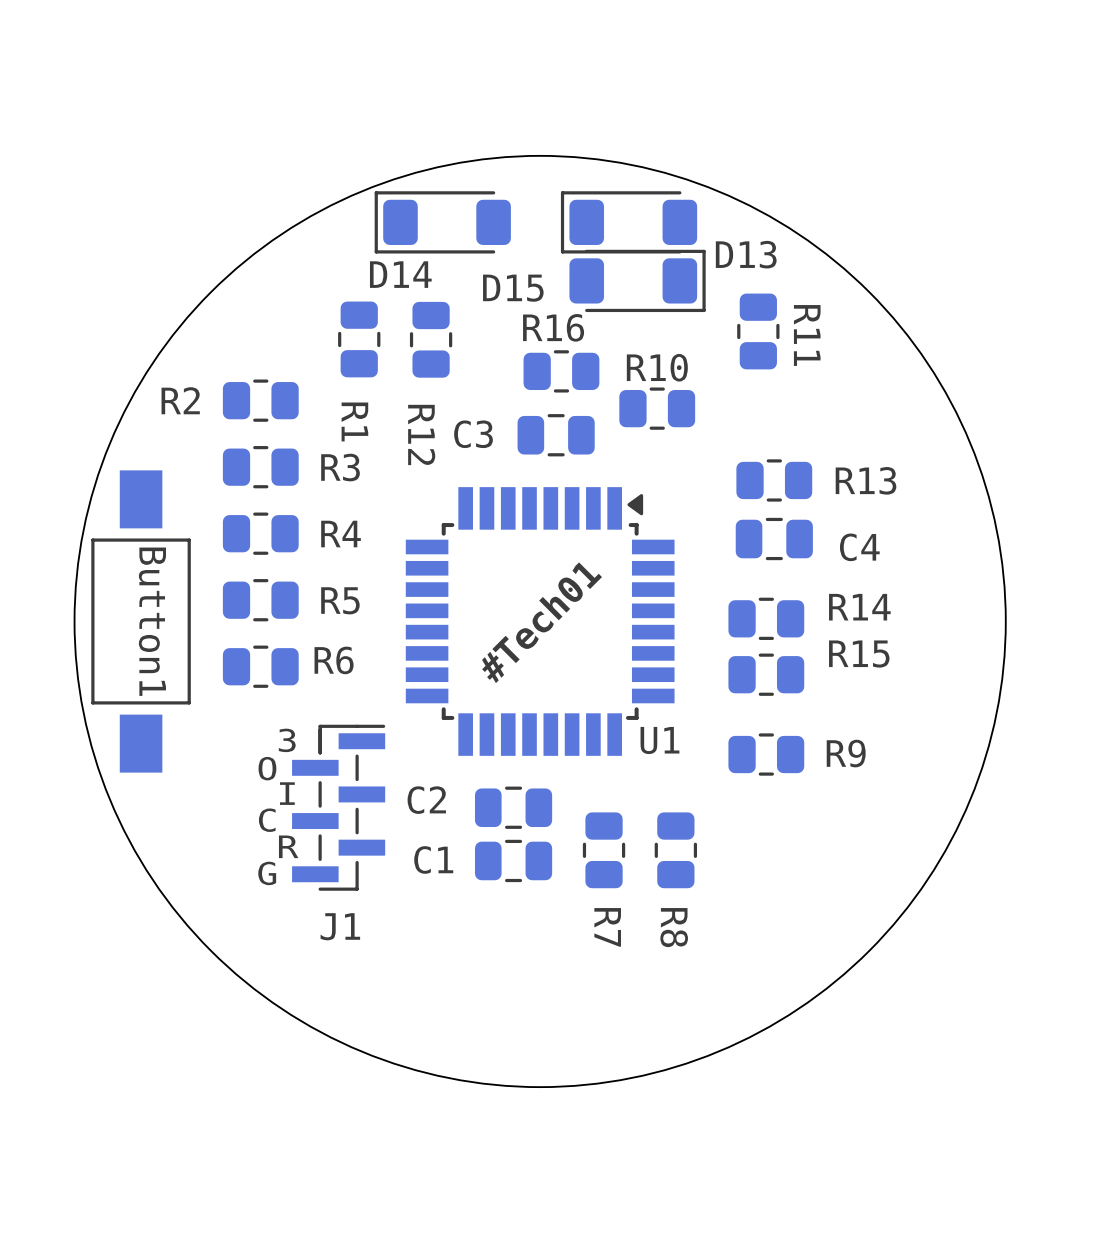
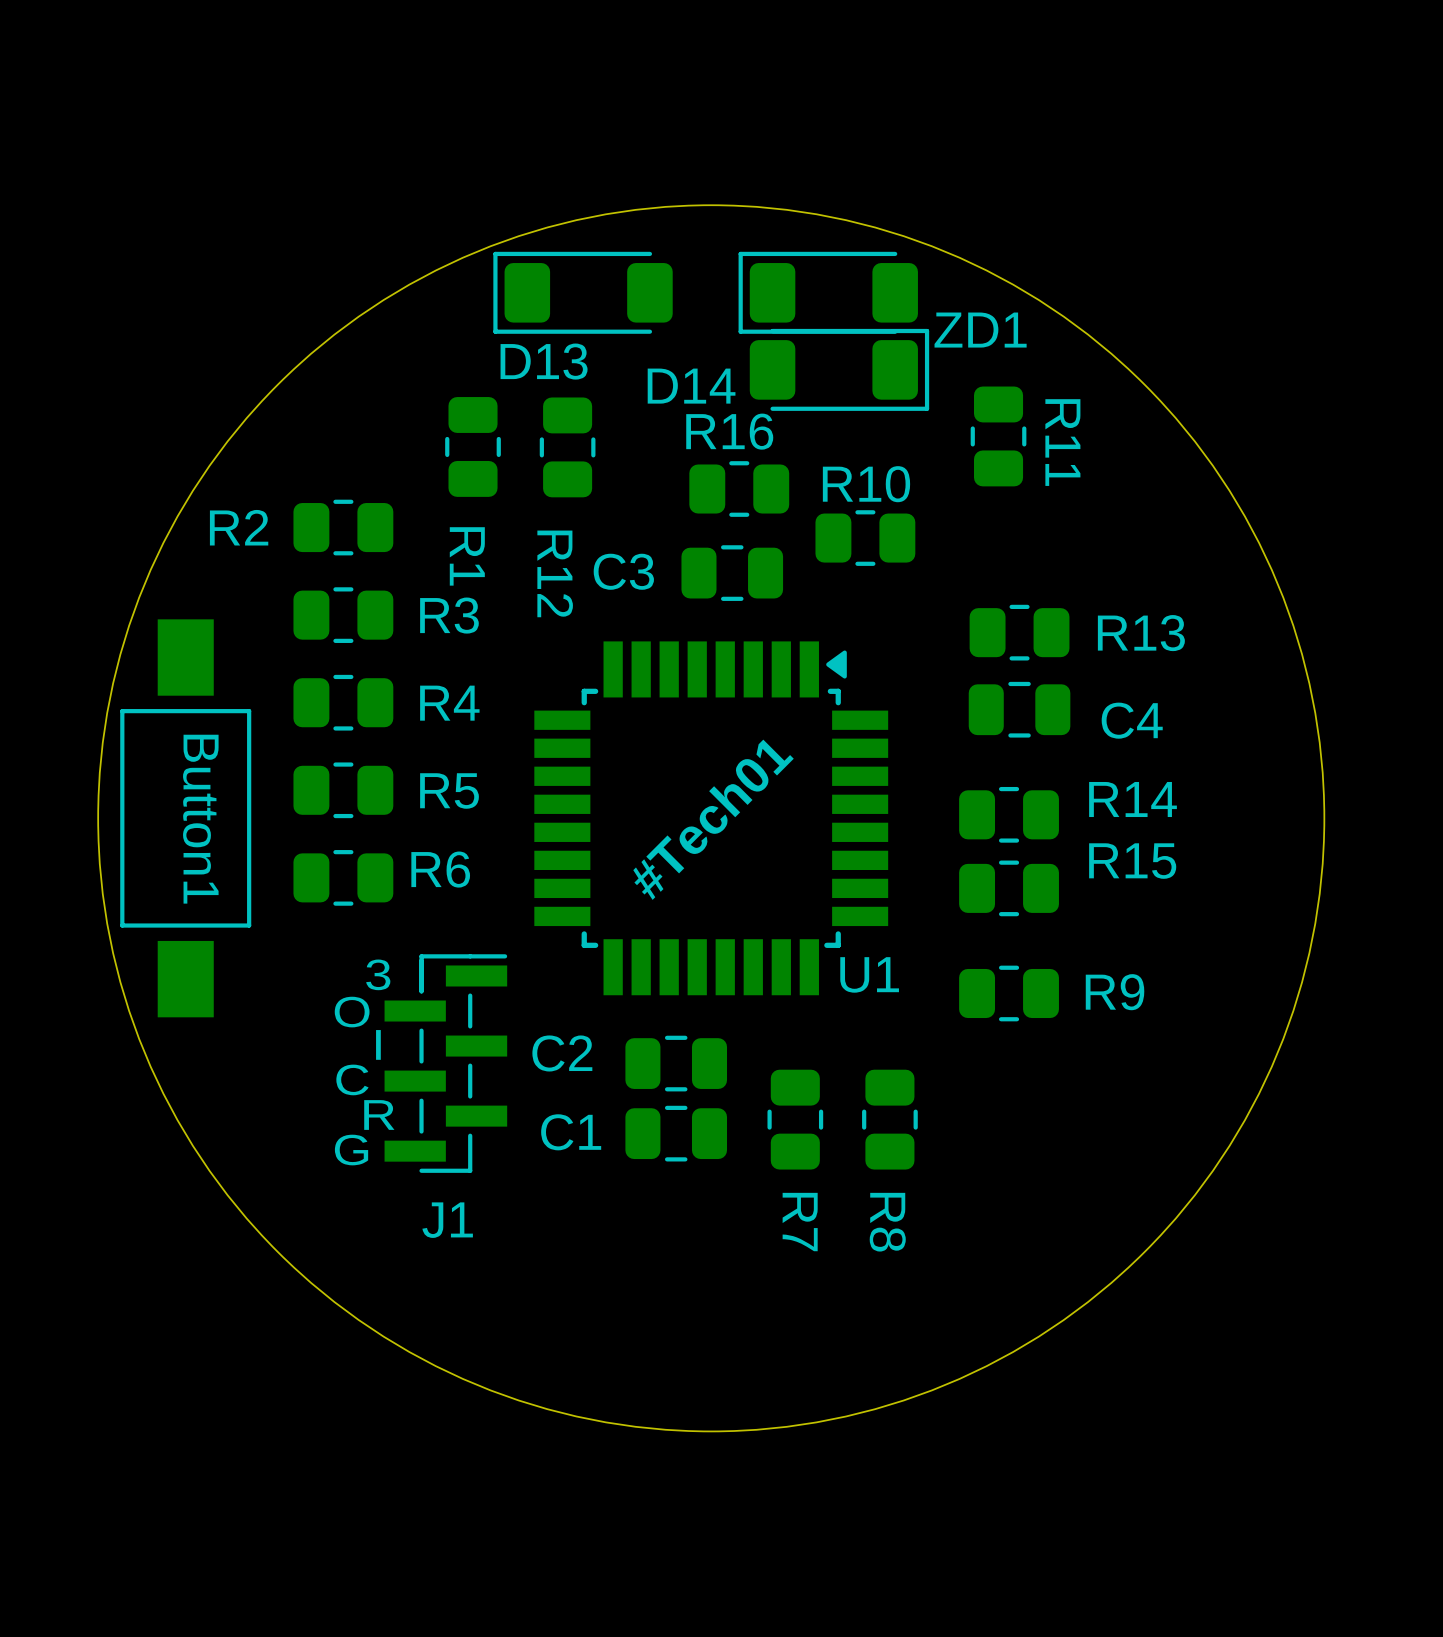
D13 name: D13 (746, 254) -> ZD1 (980, 330)
D14 name: D14 (400, 274) -> D13 (544, 361)
D15 name: D15 (513, 288) -> D14 (691, 386)

